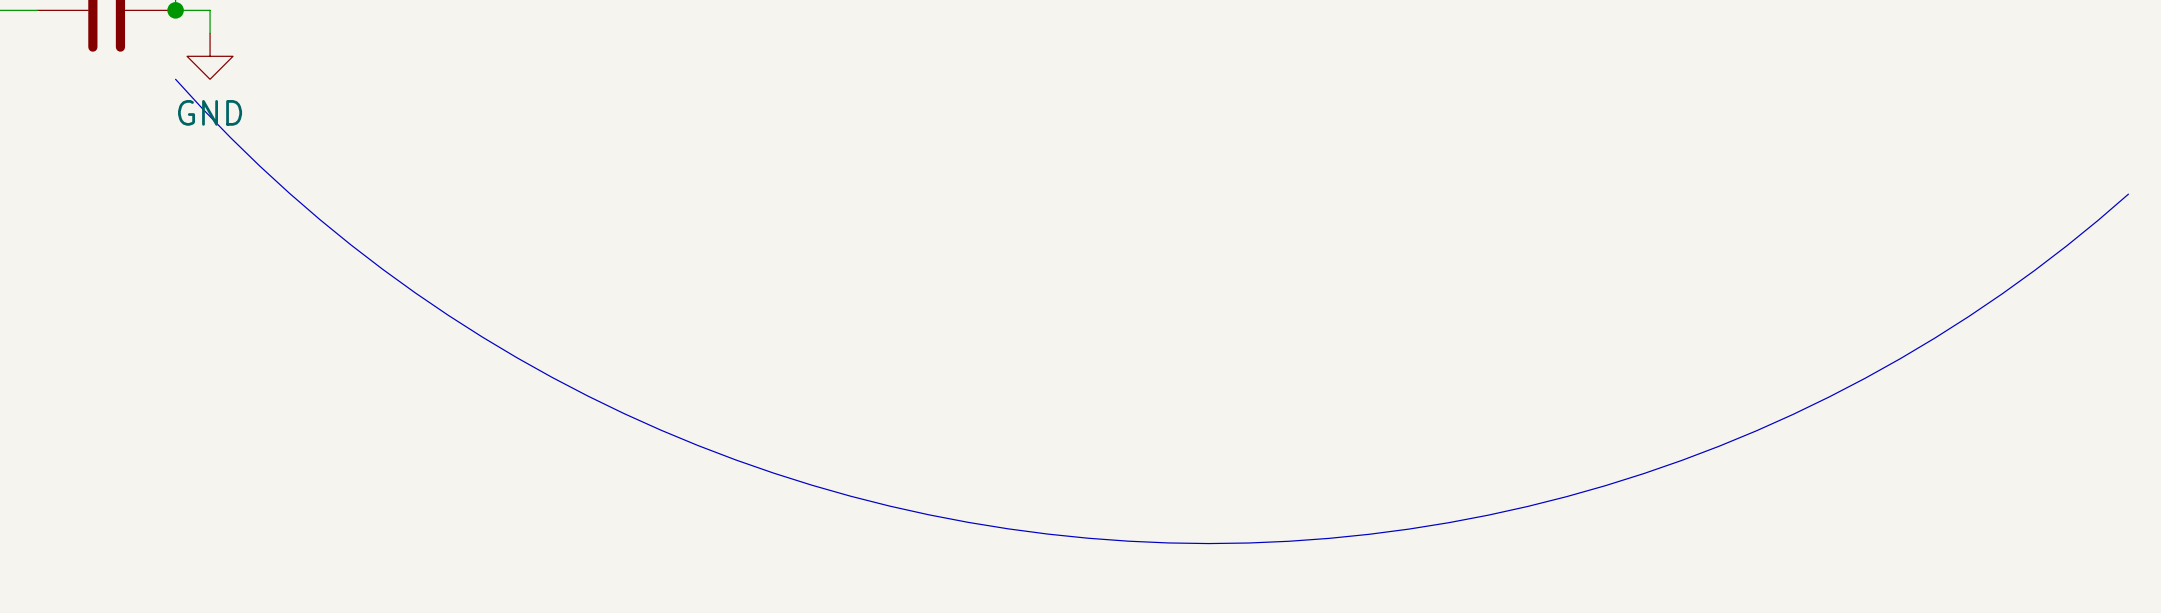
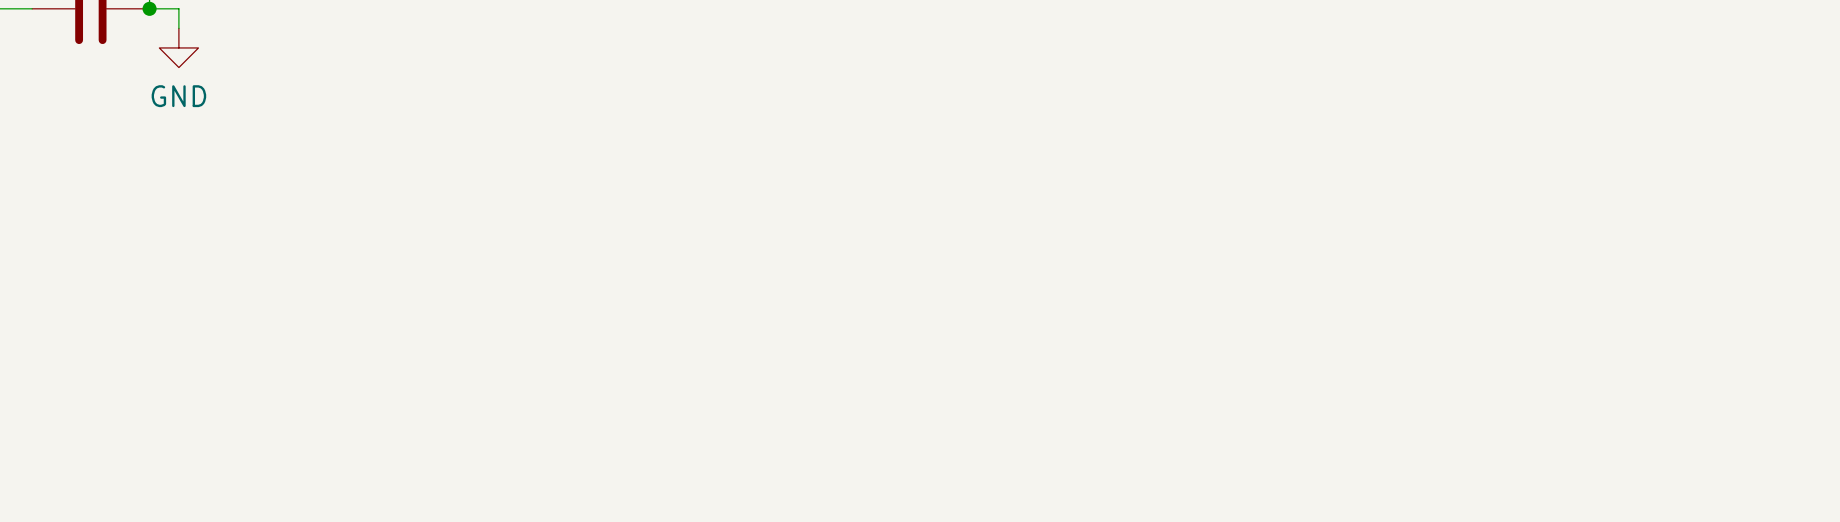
line: (175, 79) (230, 137) (289, 193) (382, 269) (482, 337) (552, 377) (624, 413) (735, 459) (811, 485) (889, 506) (1008, 528) (1128, 541) (1248, 543) (1329, 538) (1409, 529) (1488, 515) (1566, 496) (1681, 460) (1793, 414) (1900, 358) (2002, 293) (2066, 245) (2128, 194) -> none

